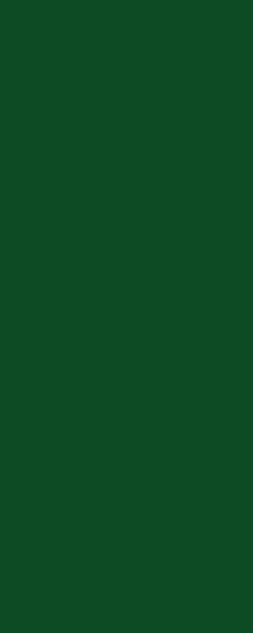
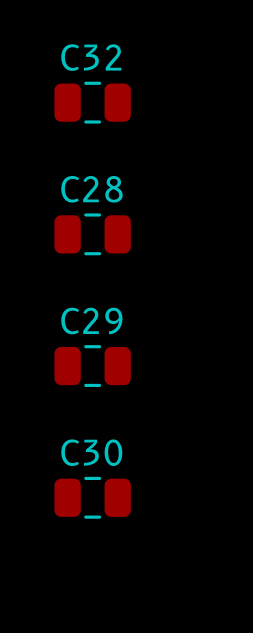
C32: none -> (92, 102)
C28: none -> (92, 234)
C29: none -> (92, 366)
C30: none -> (92, 497)

